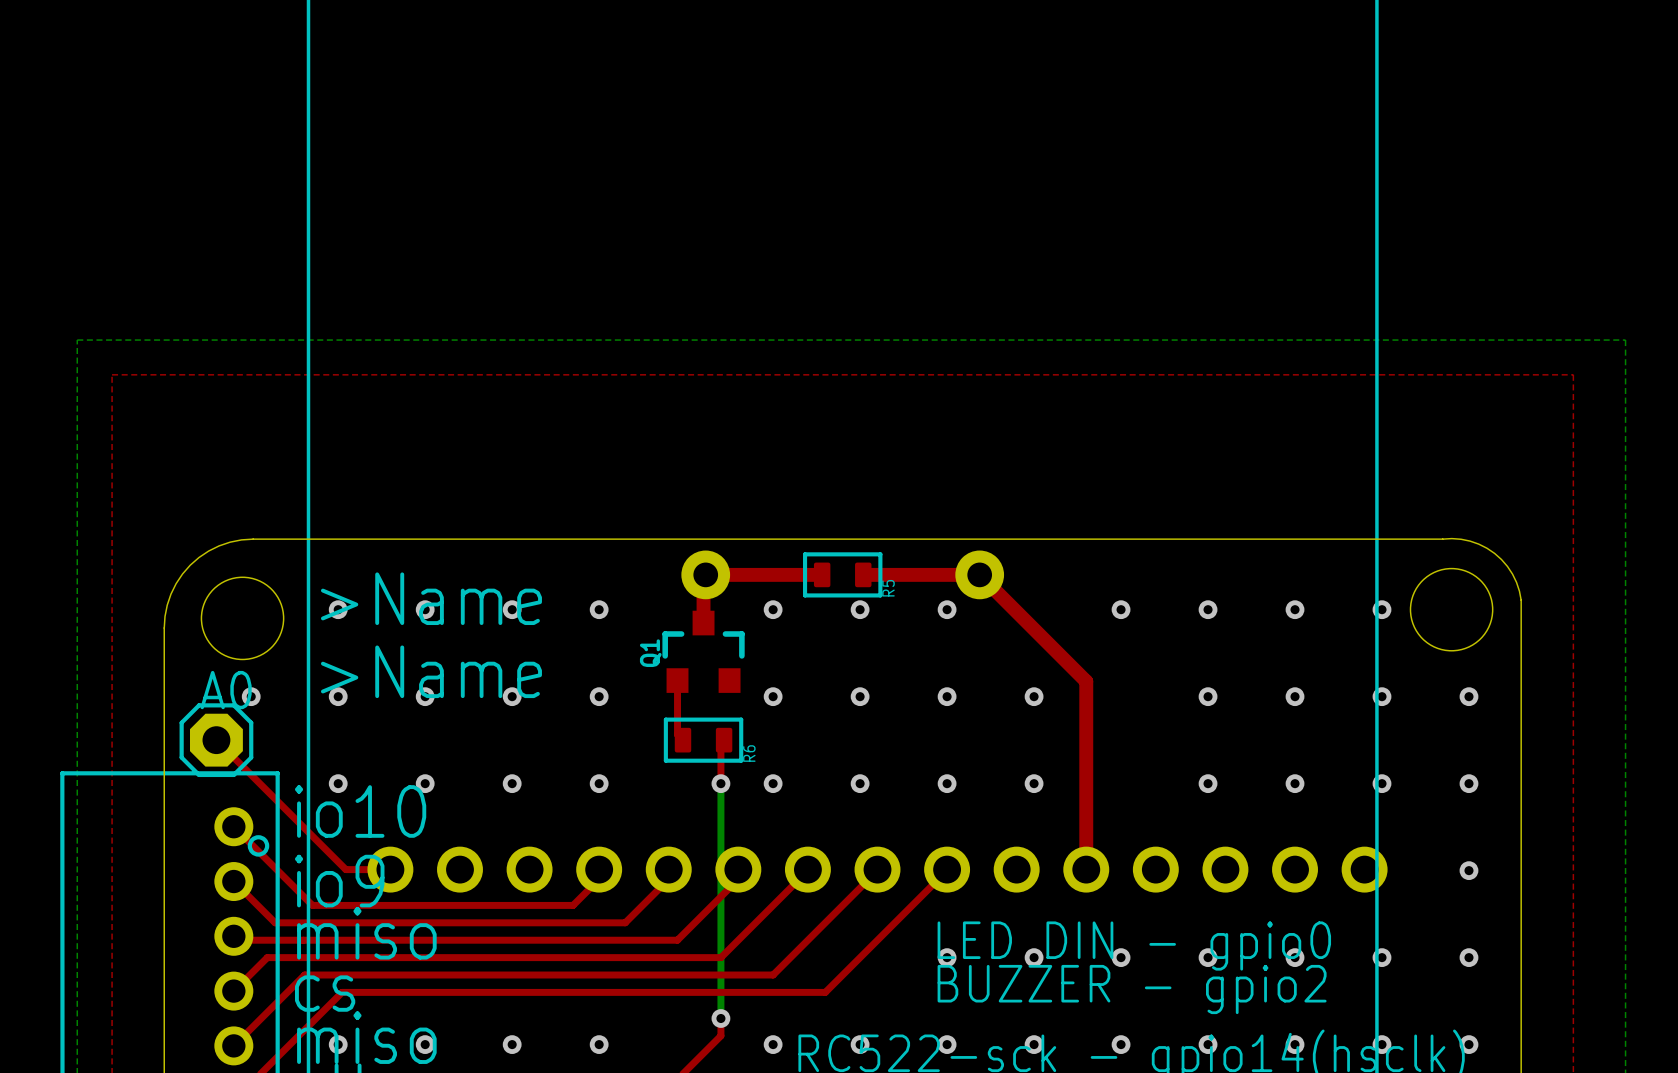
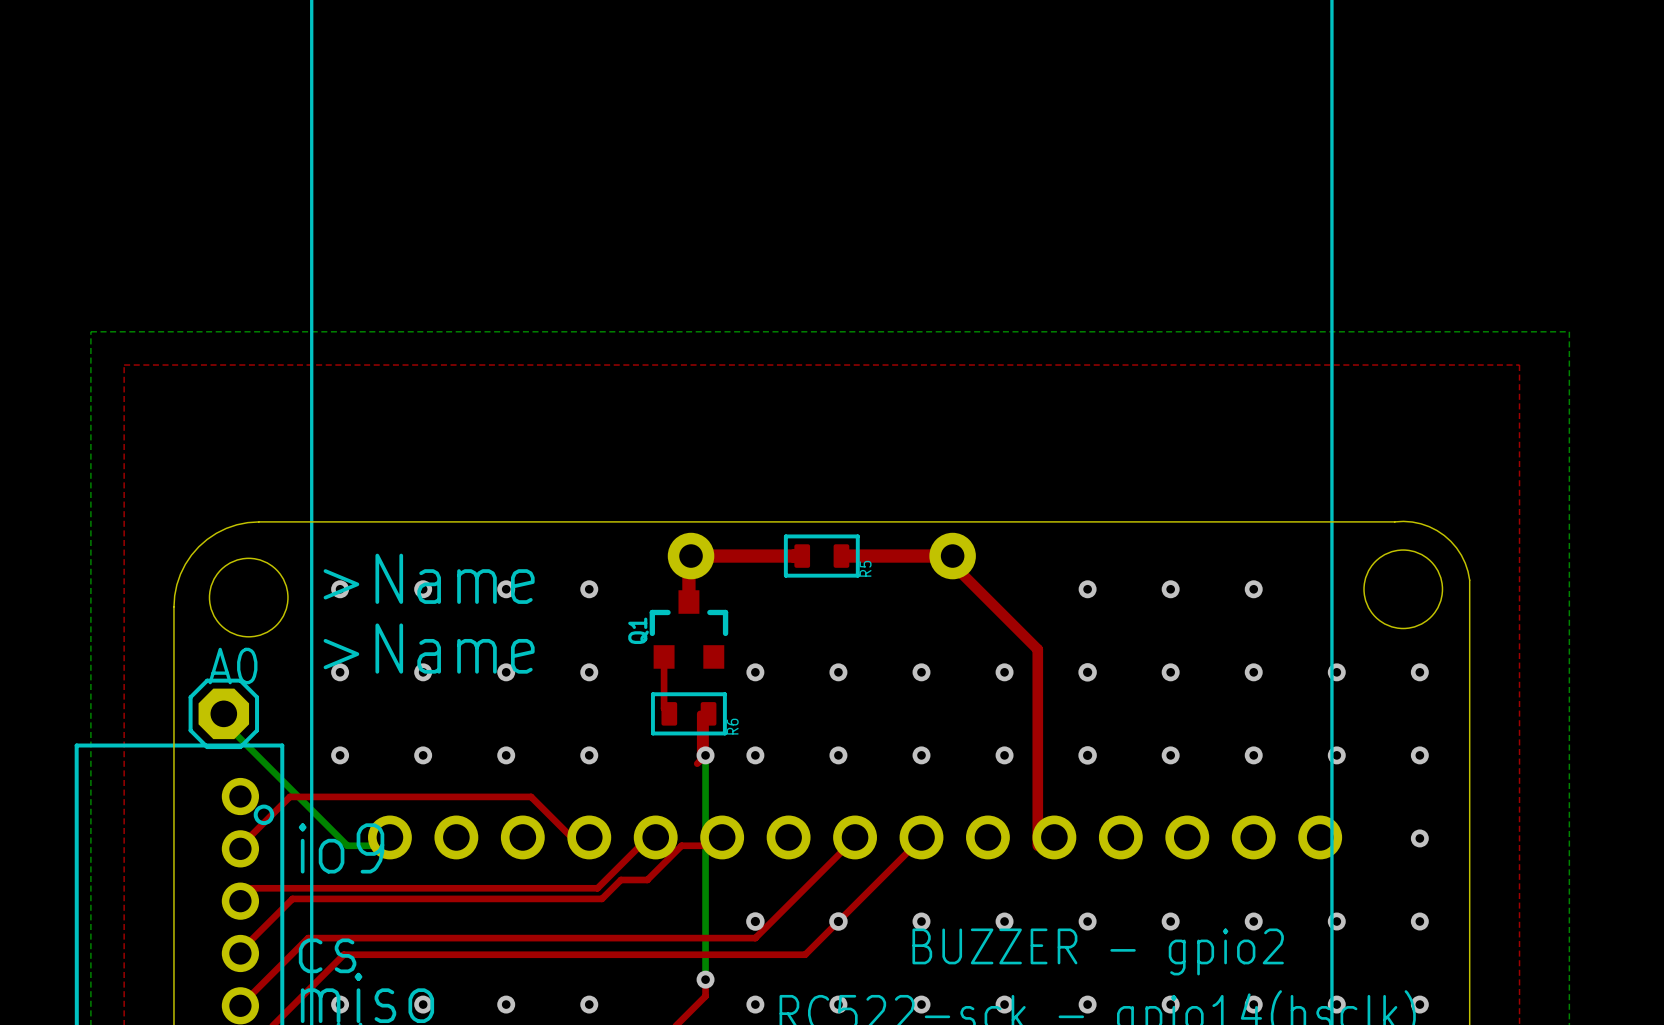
top track: (970, 574) (979, 574) (1086, 681) (1086, 869) -> (944, 556) (1037, 649) (1037, 845)
via: (773, 609) -> none
via: (860, 609) -> none
via: (947, 609) -> none
via: (1382, 609) -> none
via: (251, 696) -> none
via: none -> (1087, 672)
top track: (216, 740) (345, 869) (390, 869) -> none
top track: none -> (700, 713) (700, 760) (697, 763)
bottom track: none -> (223, 722) (347, 845) (373, 845)
via: none -> (1087, 755)
text: io10 (360, 811) -> none
top track: (233, 826) (312, 905) (573, 905) (608, 869) (599, 869) -> none
top track: (668, 869) (678, 869) (625, 922) (607, 922) -> (639, 845) (597, 888)
top track: (738, 869) (748, 869) (677, 940) (237, 940) (233, 936) -> none
top track: (807, 869) (720, 957) (267, 957) (233, 991) -> none
top track: none -> (572, 845) (572, 838) (531, 796) (289, 796) (232, 854)
top track: none -> (705, 845) (681, 845) (647, 879) (620, 879) (601, 898) (292, 898) (232, 959)
top track: (233, 881) (275, 922) -> (232, 906) (250, 888) (279, 888)
text: miso (366, 933) -> none
text: LED DIN - gpio0 (1134, 946) -> none
via: none -> (755, 921)
via: none -> (838, 921)

